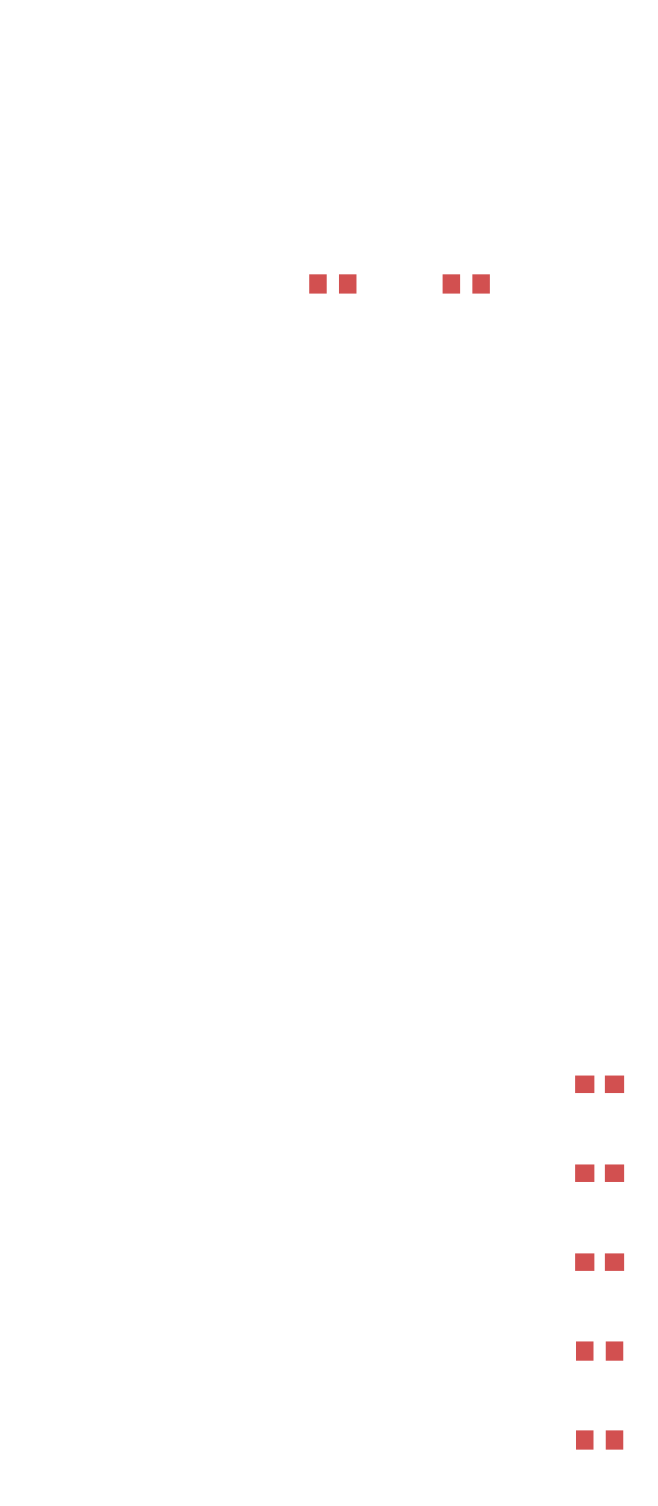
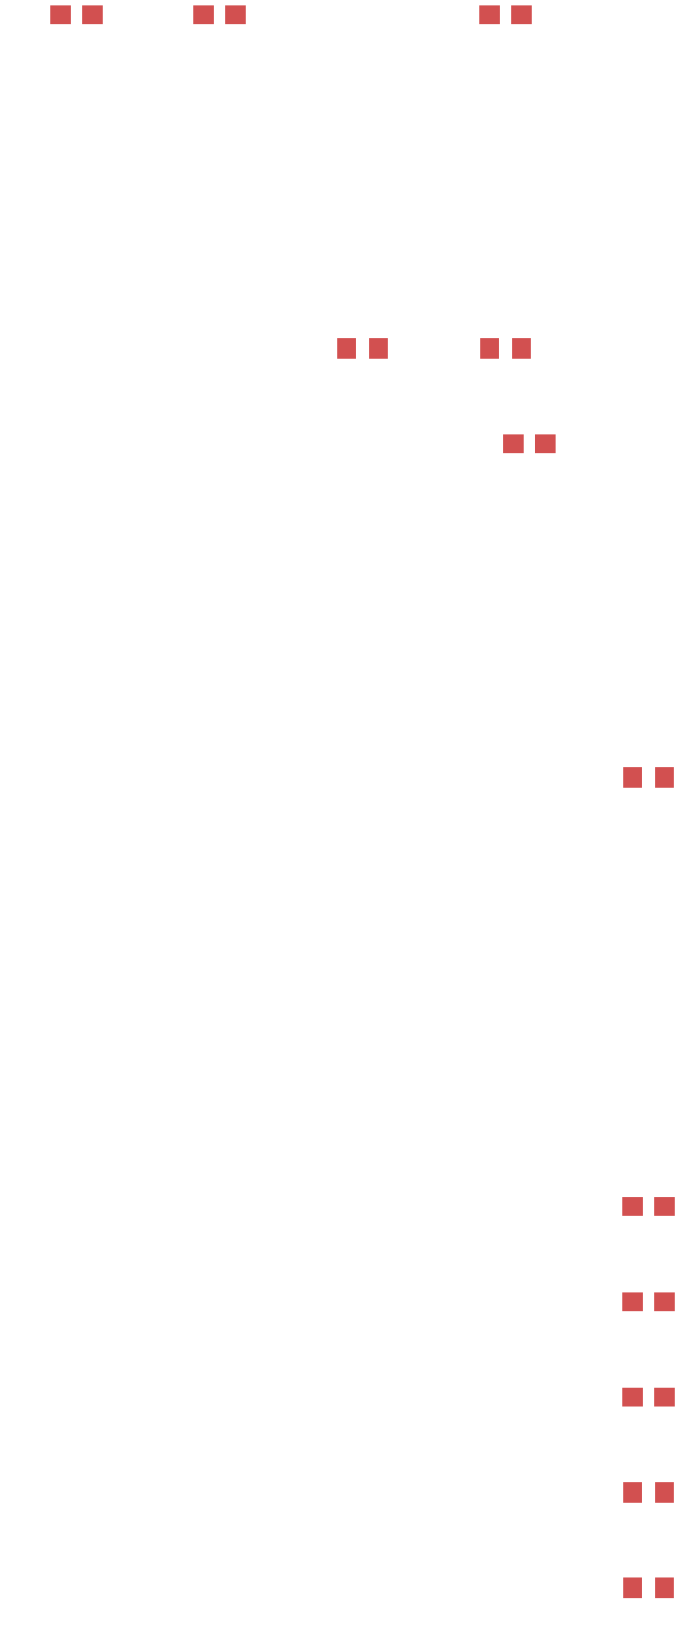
part: none -> (529, 443)
part: none -> (648, 777)

